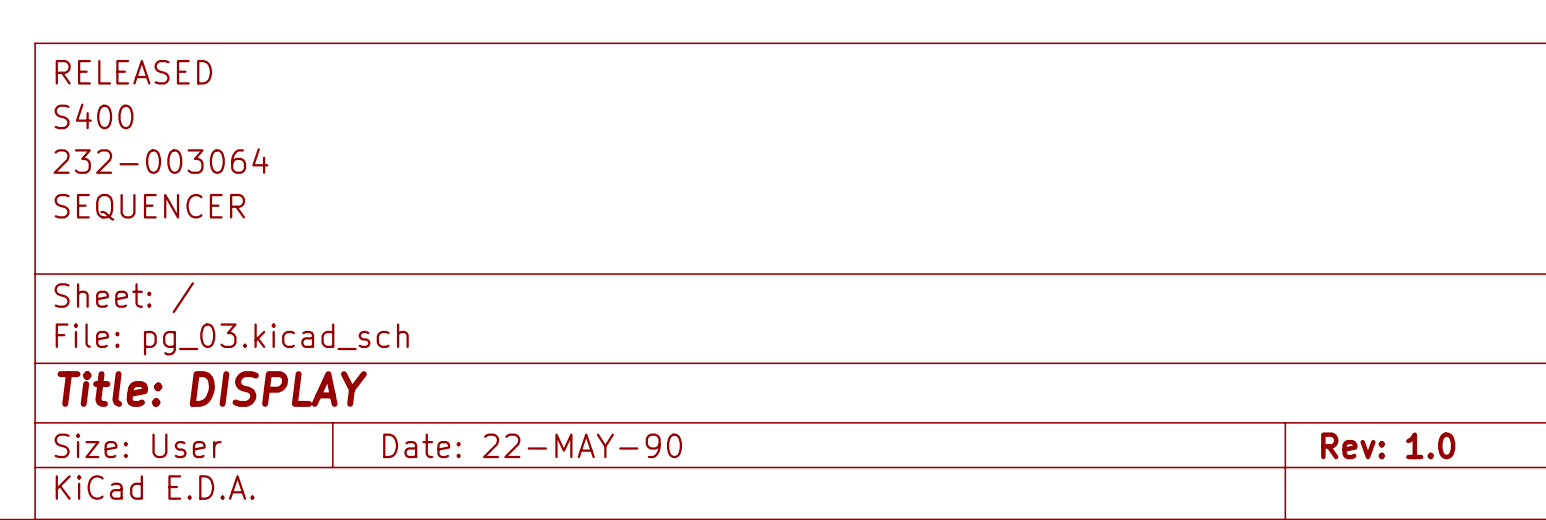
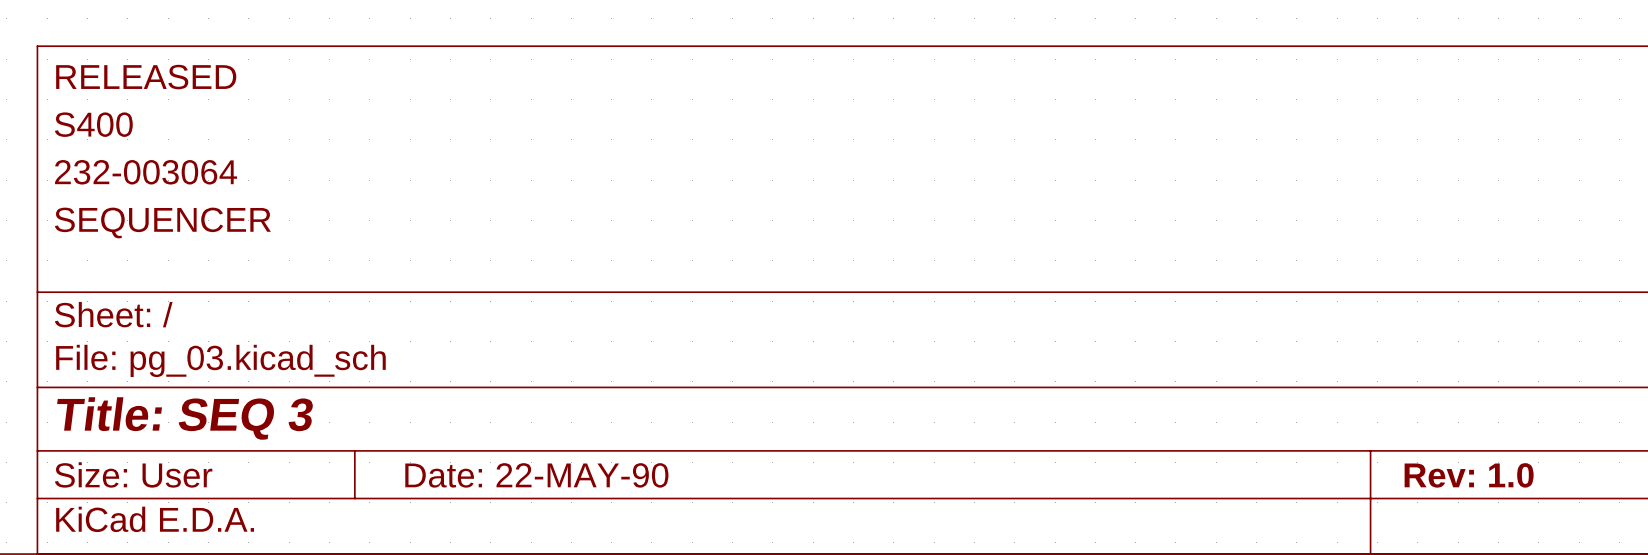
title block: Title: DISPLAY (212, 389) -> Title: SEQ 3 (185, 418)

